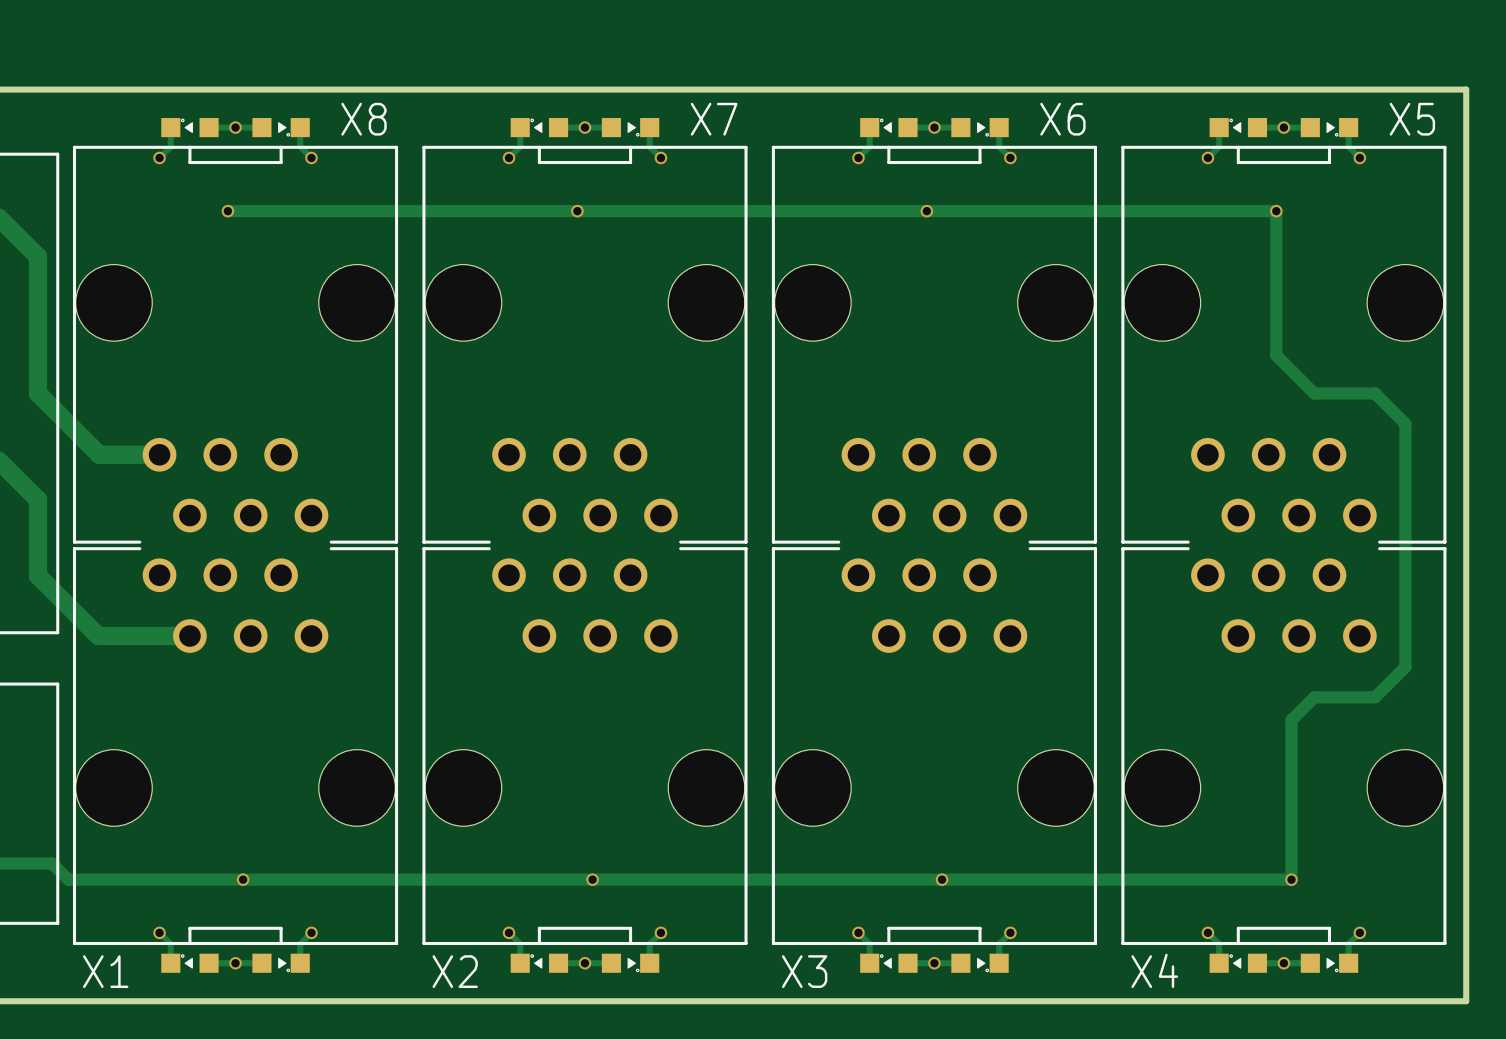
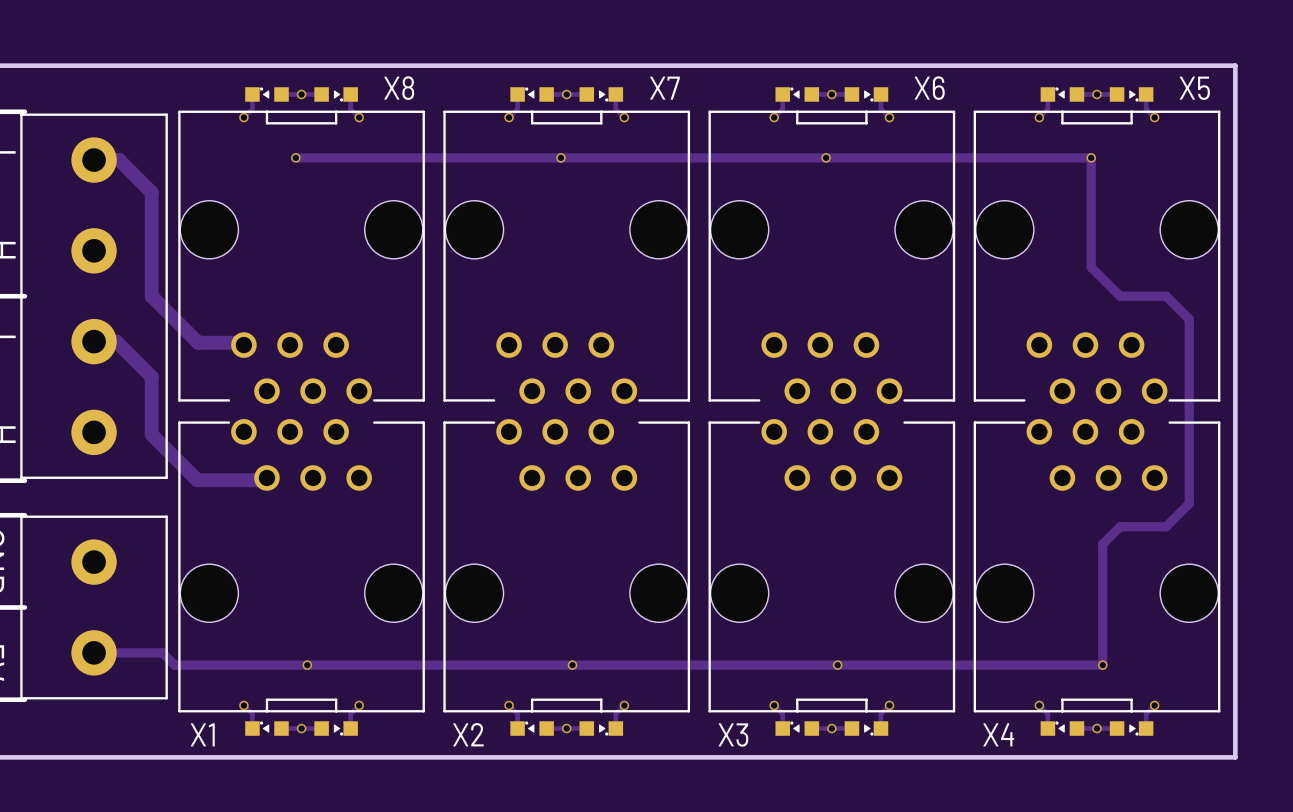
X8 footprint: [72, 145, 399, 544] -> [178, 110, 425, 404]
X7 footprint: [422, 145, 748, 544] -> [443, 110, 691, 404]
X6 footprint: [771, 145, 1097, 544] -> [708, 110, 956, 404]
X5 footprint: [1121, 145, 1447, 544] -> [973, 110, 1221, 404]
X1 footprint: [72, 547, 399, 946] -> [178, 419, 425, 713]
X2 footprint: [422, 547, 748, 946] -> [443, 419, 691, 713]
X3 footprint: [771, 547, 1097, 946] -> [708, 419, 956, 713]
X4 footprint: [1121, 547, 1447, 946] -> [973, 419, 1221, 713]

